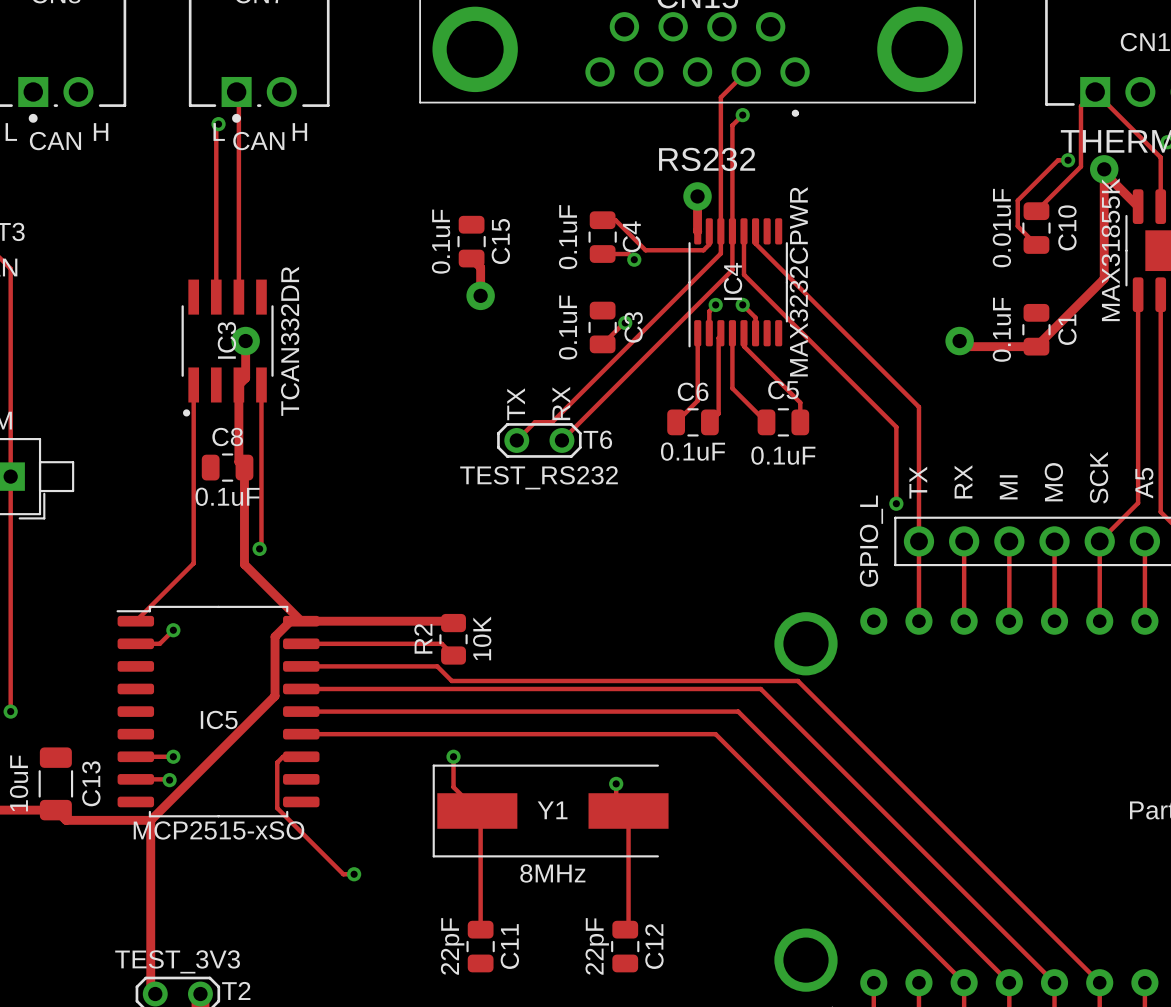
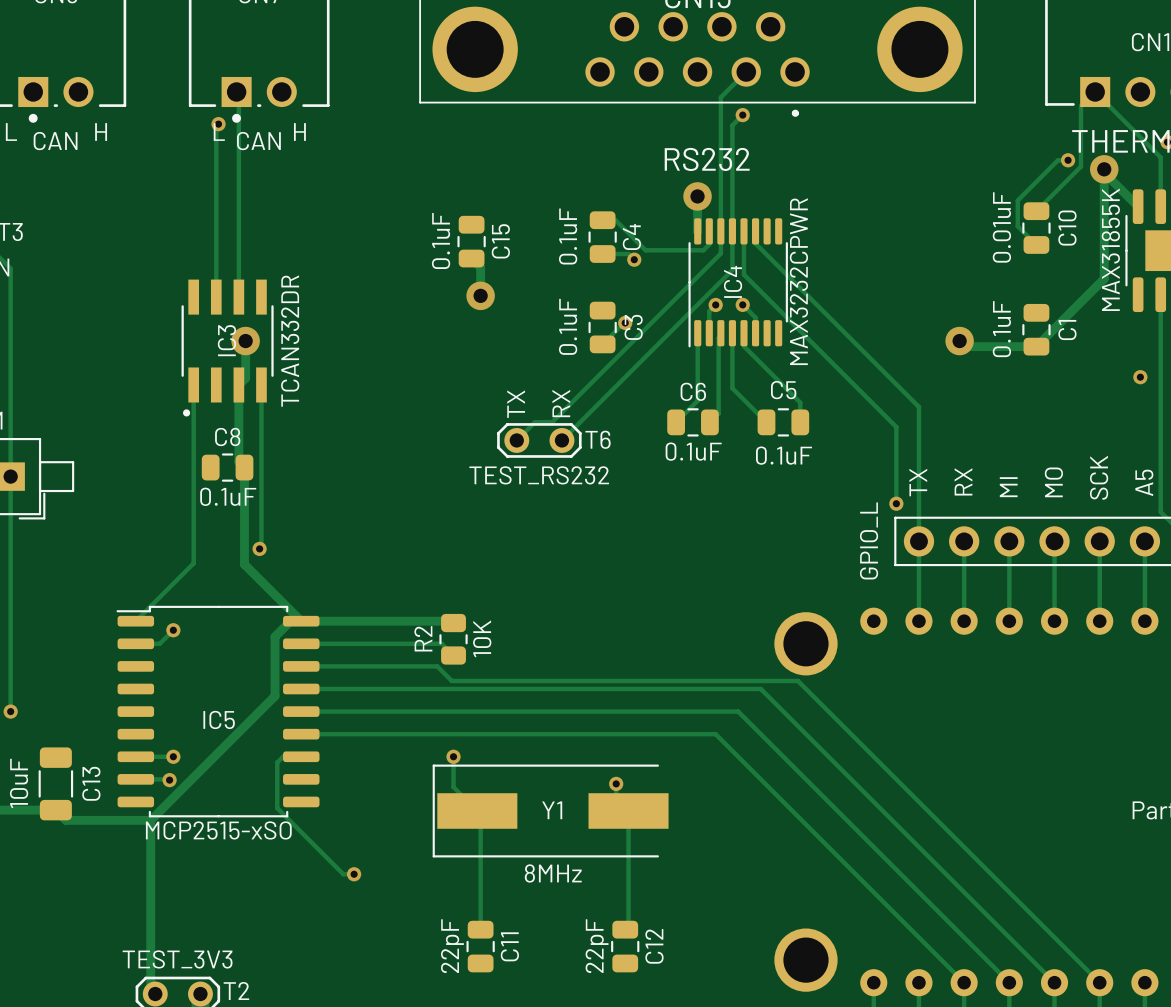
track: (1138, 294) (1138, 503) (1099, 541) -> none
via: none -> (1140, 377)

